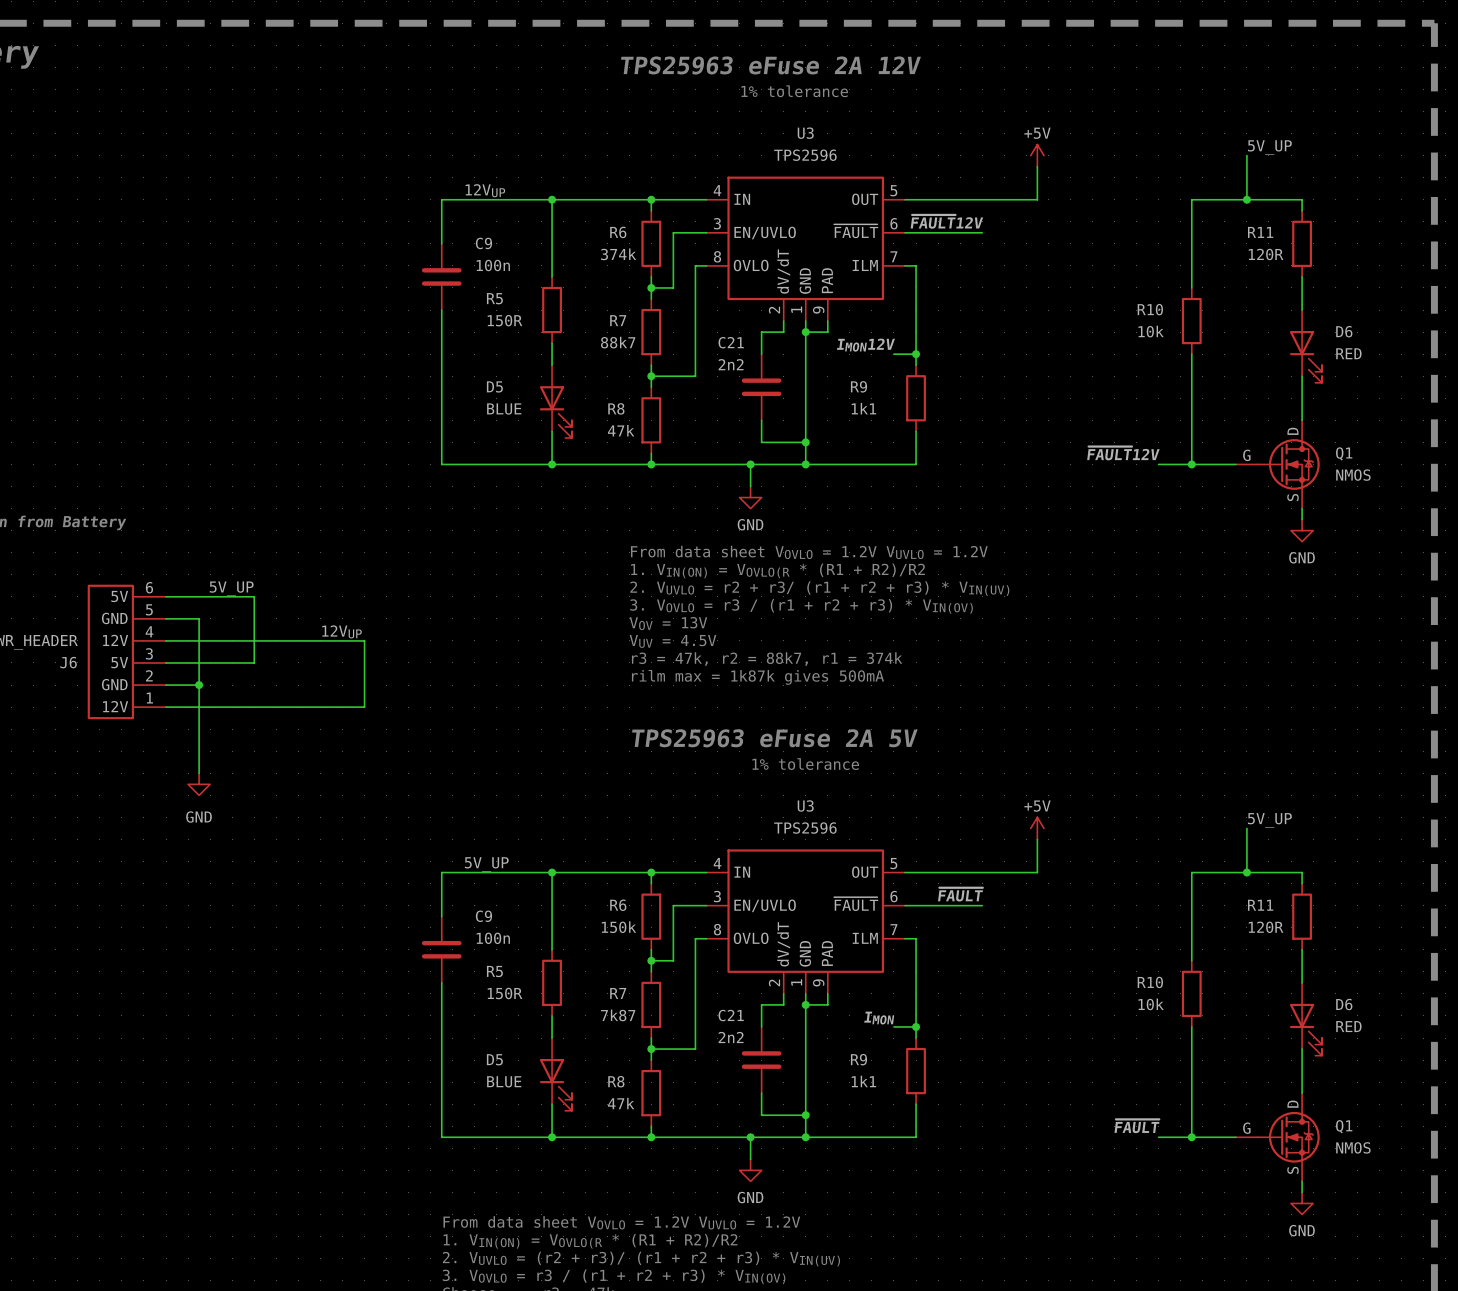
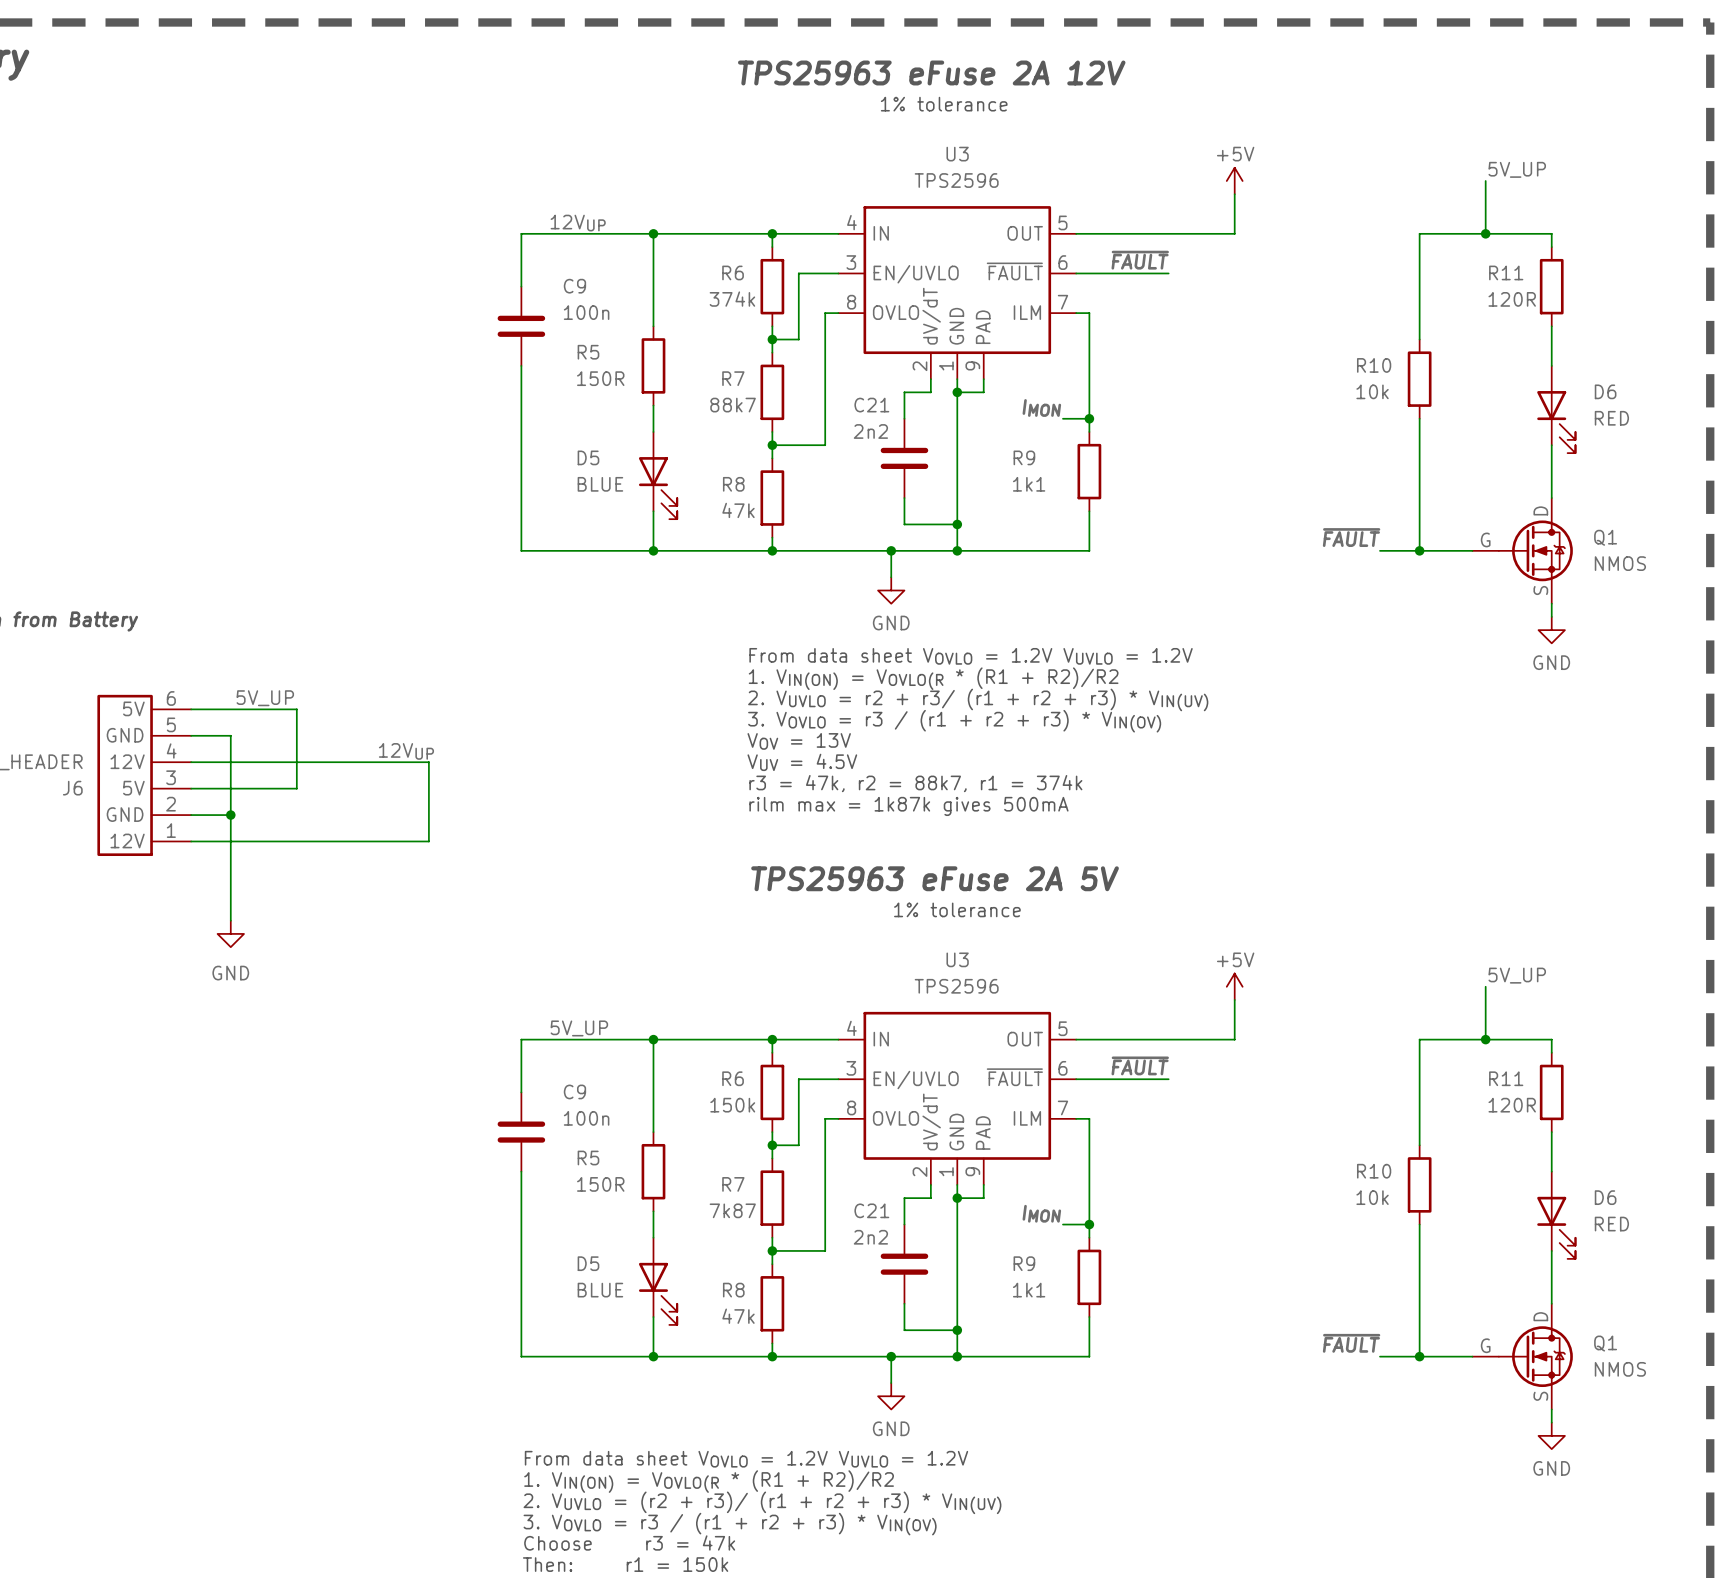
label: ~{FAULT}12V (946, 221) -> ~{FAULT} (1140, 260)
label: IMON12V (865, 345) -> IMON (1041, 407)
label: ~{FAULT}12V (1123, 453) -> ~{FAULT} (1351, 537)

